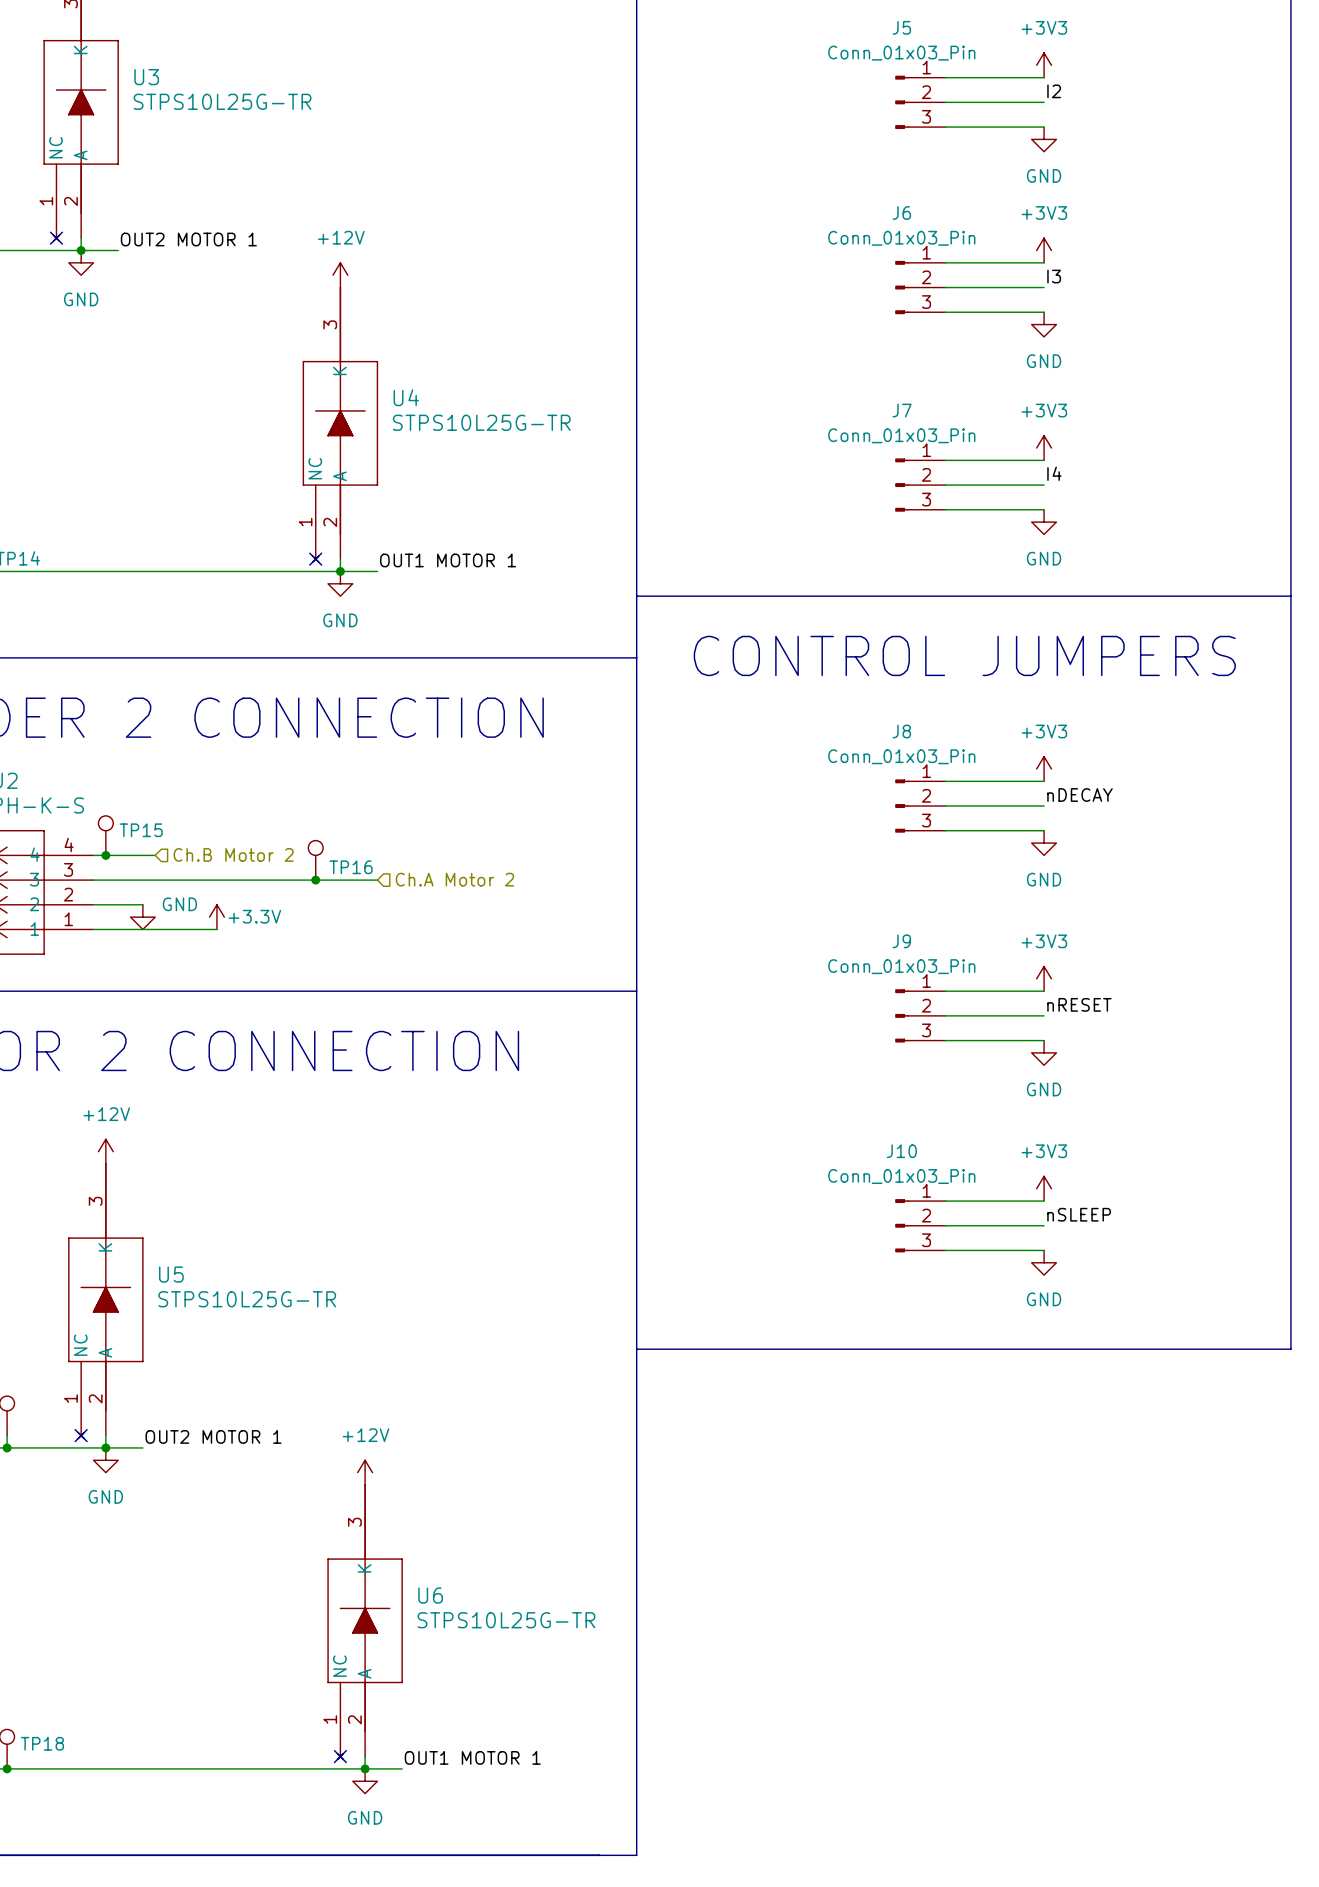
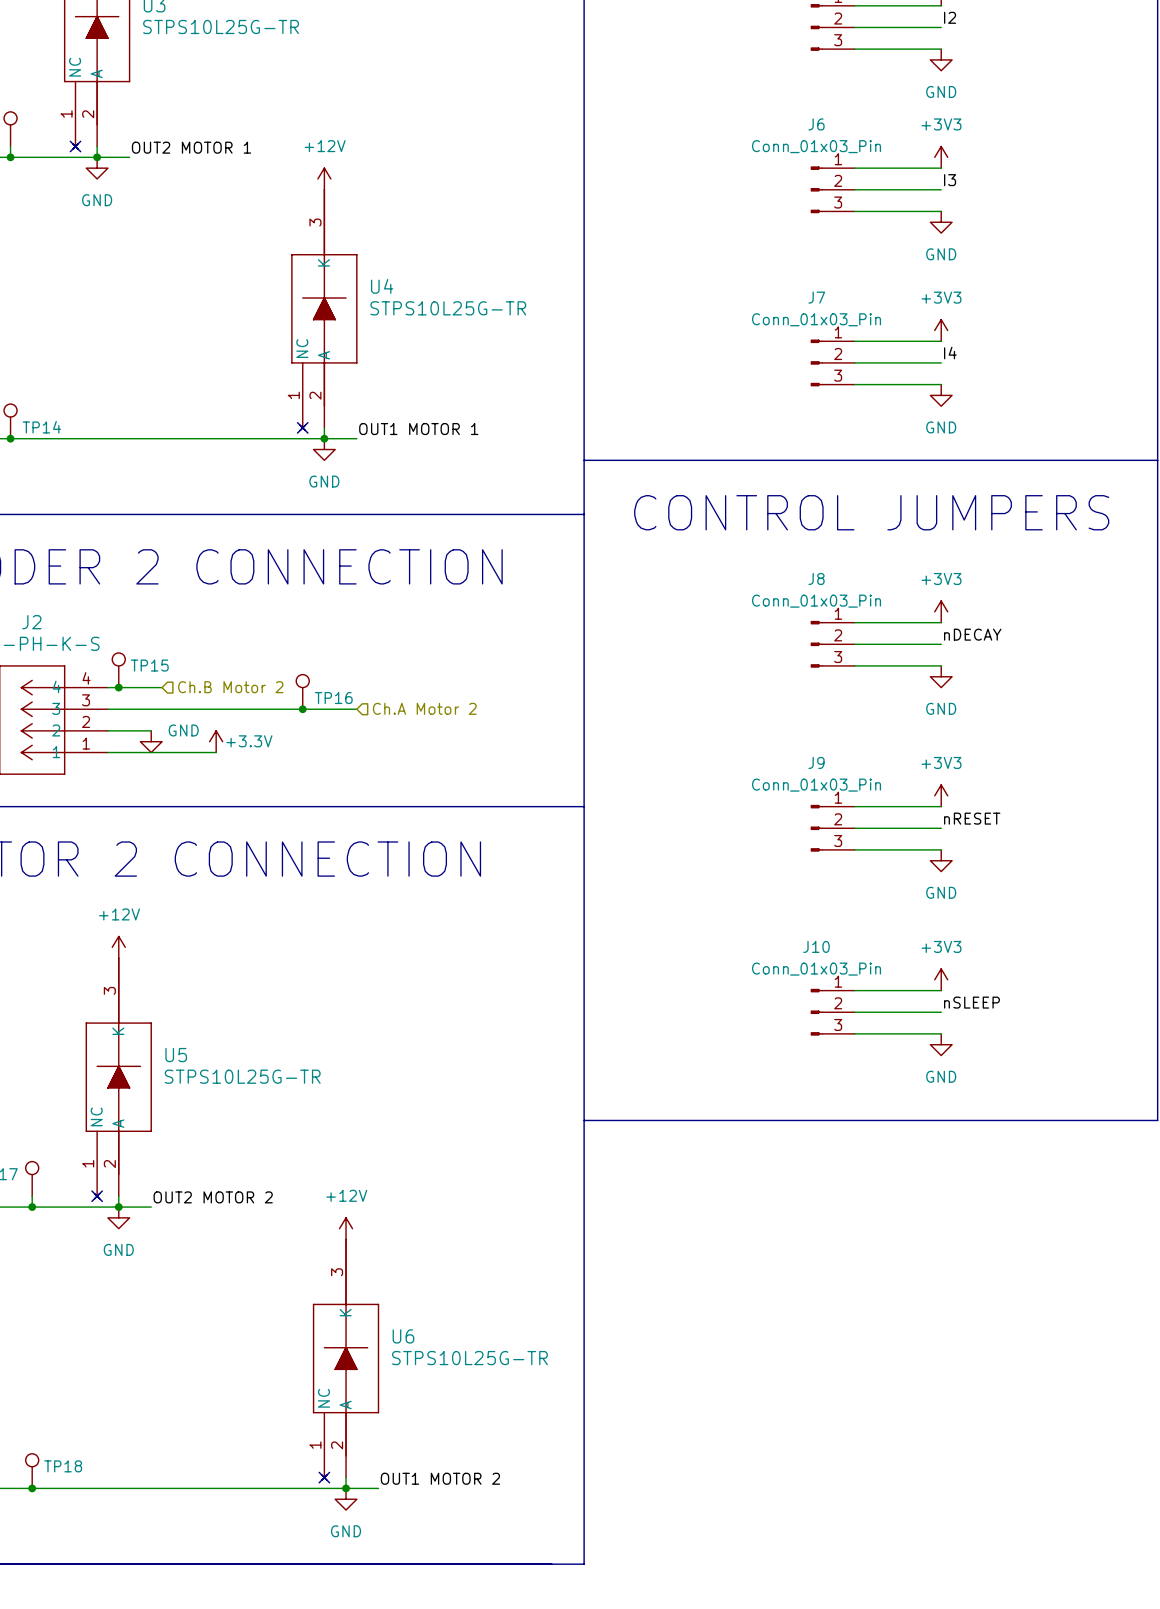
label: OUT2 MOTOR 1 (213, 1436) -> OUT2 MOTOR 2 (213, 1197)
label: OUT1 MOTOR 1 (472, 1757) -> OUT1 MOTOR 2 (440, 1478)

